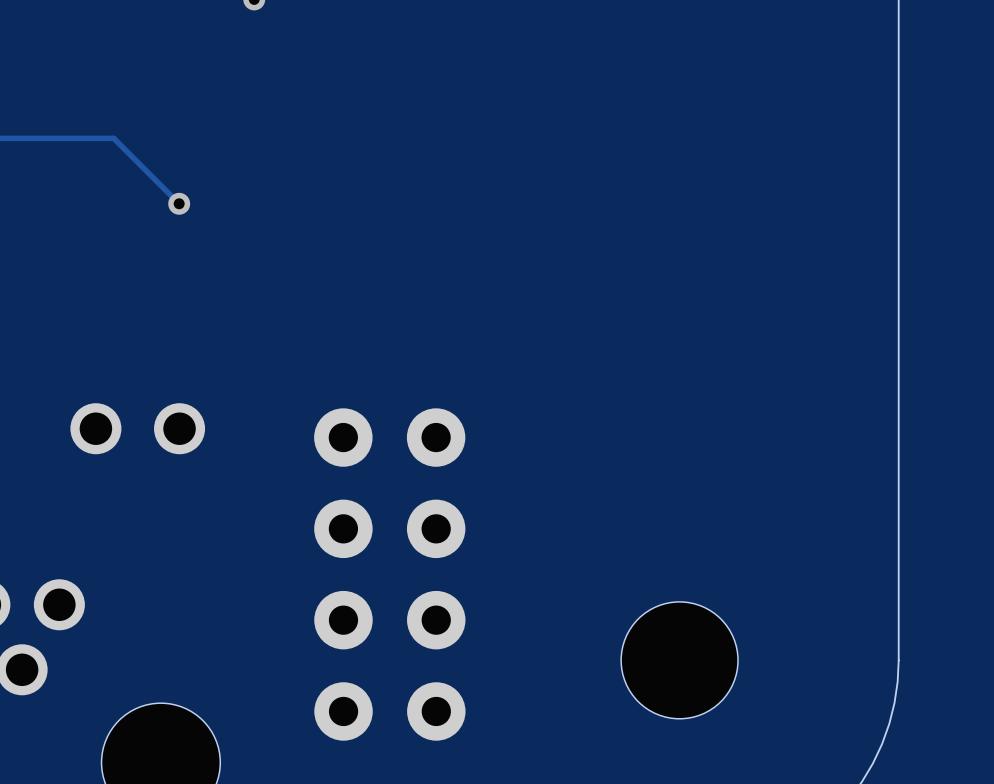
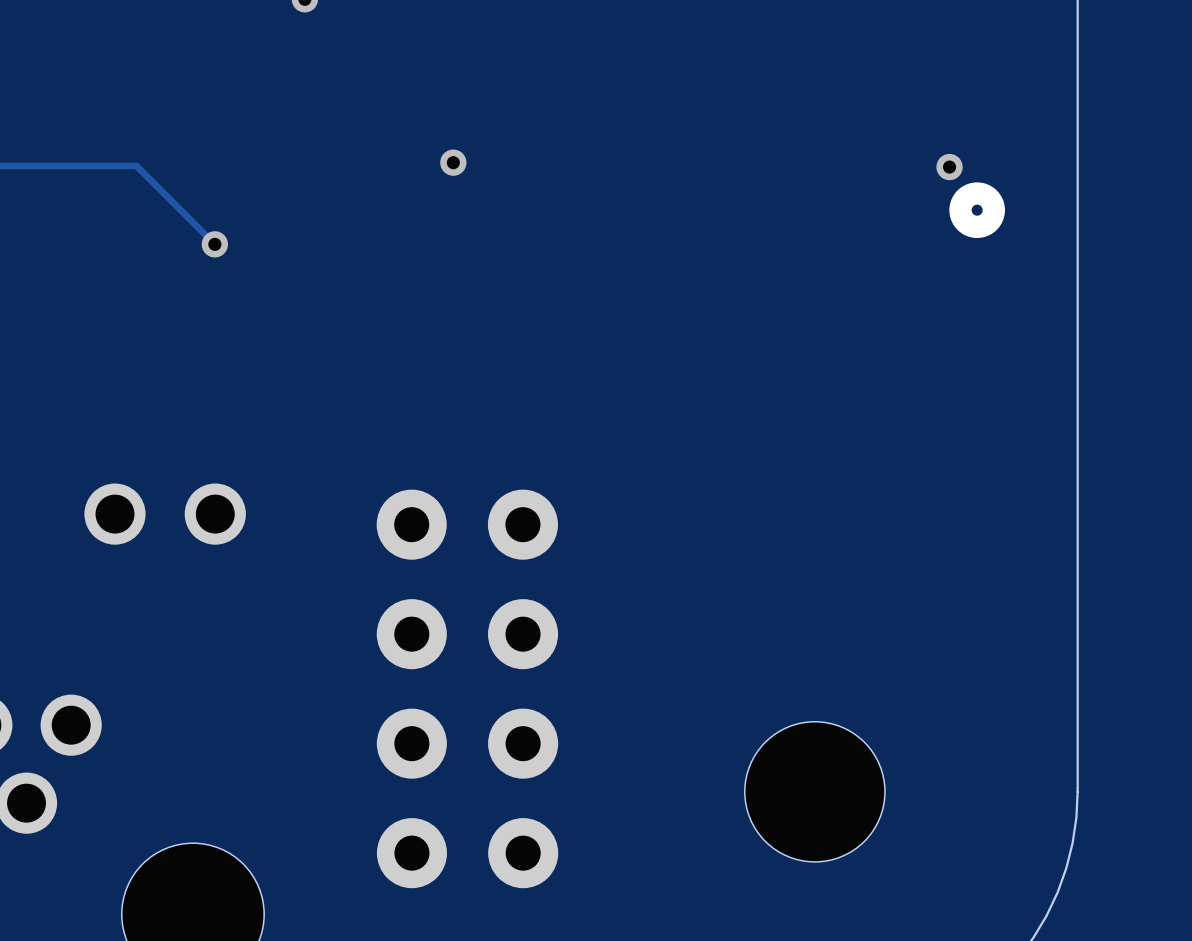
via: none -> (453, 162)
via: none -> (949, 167)
part: none -> (977, 210)

